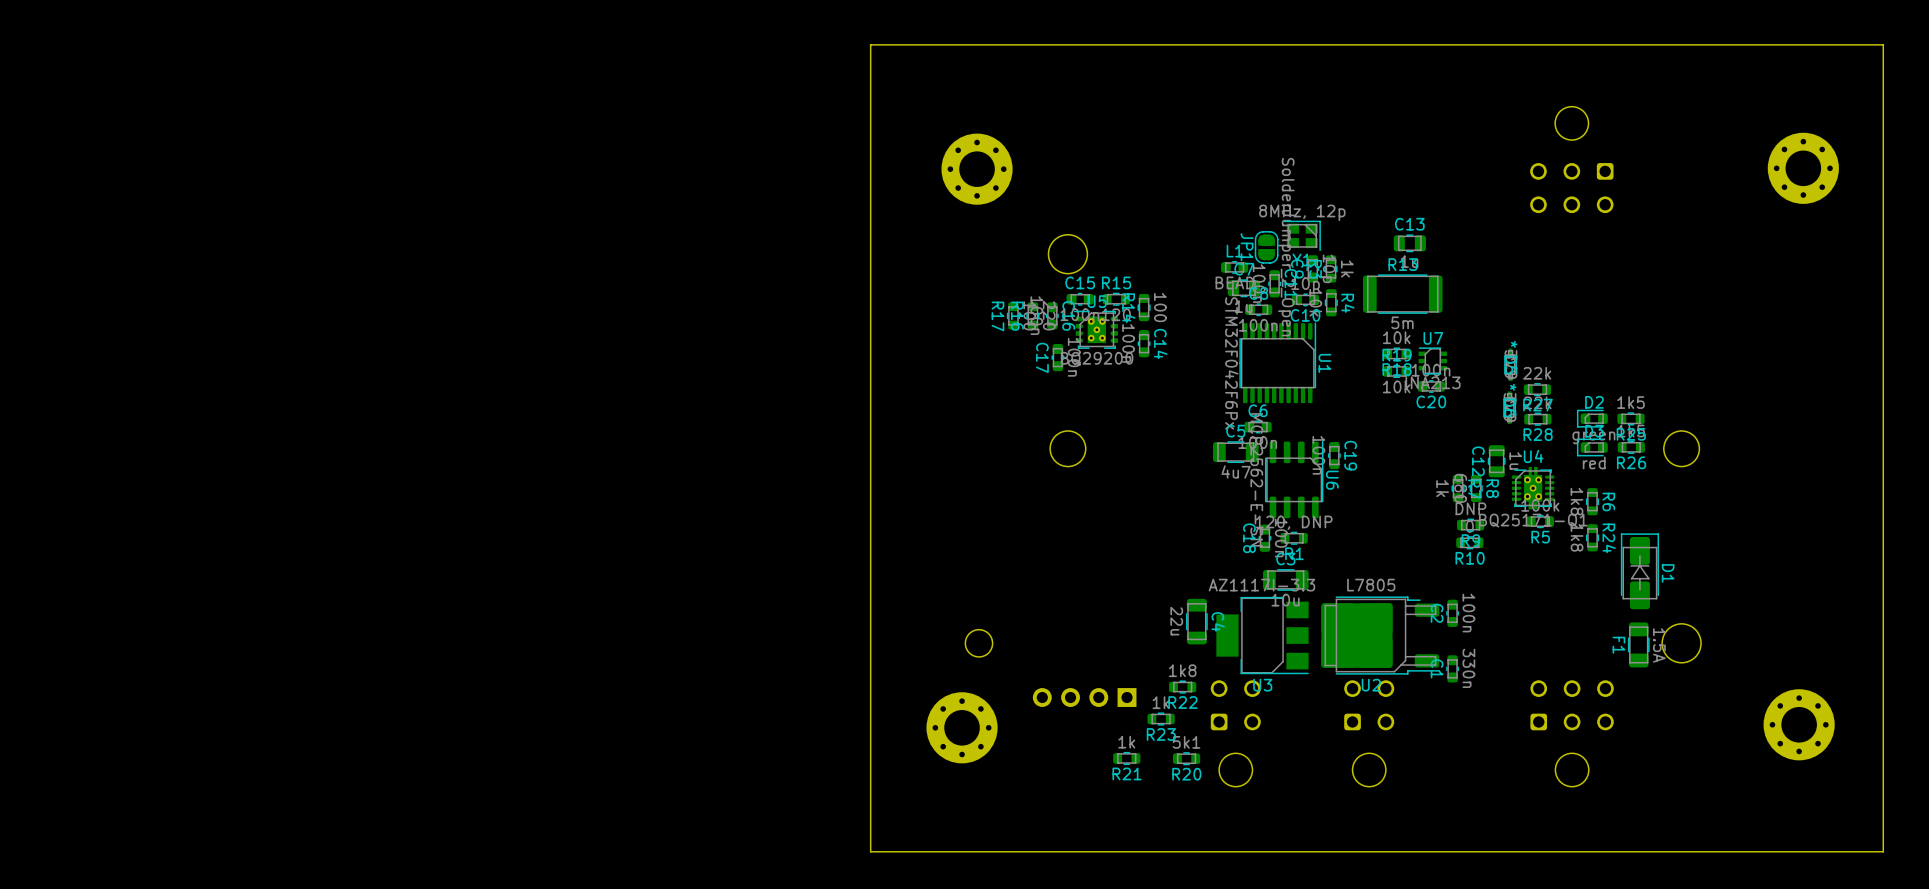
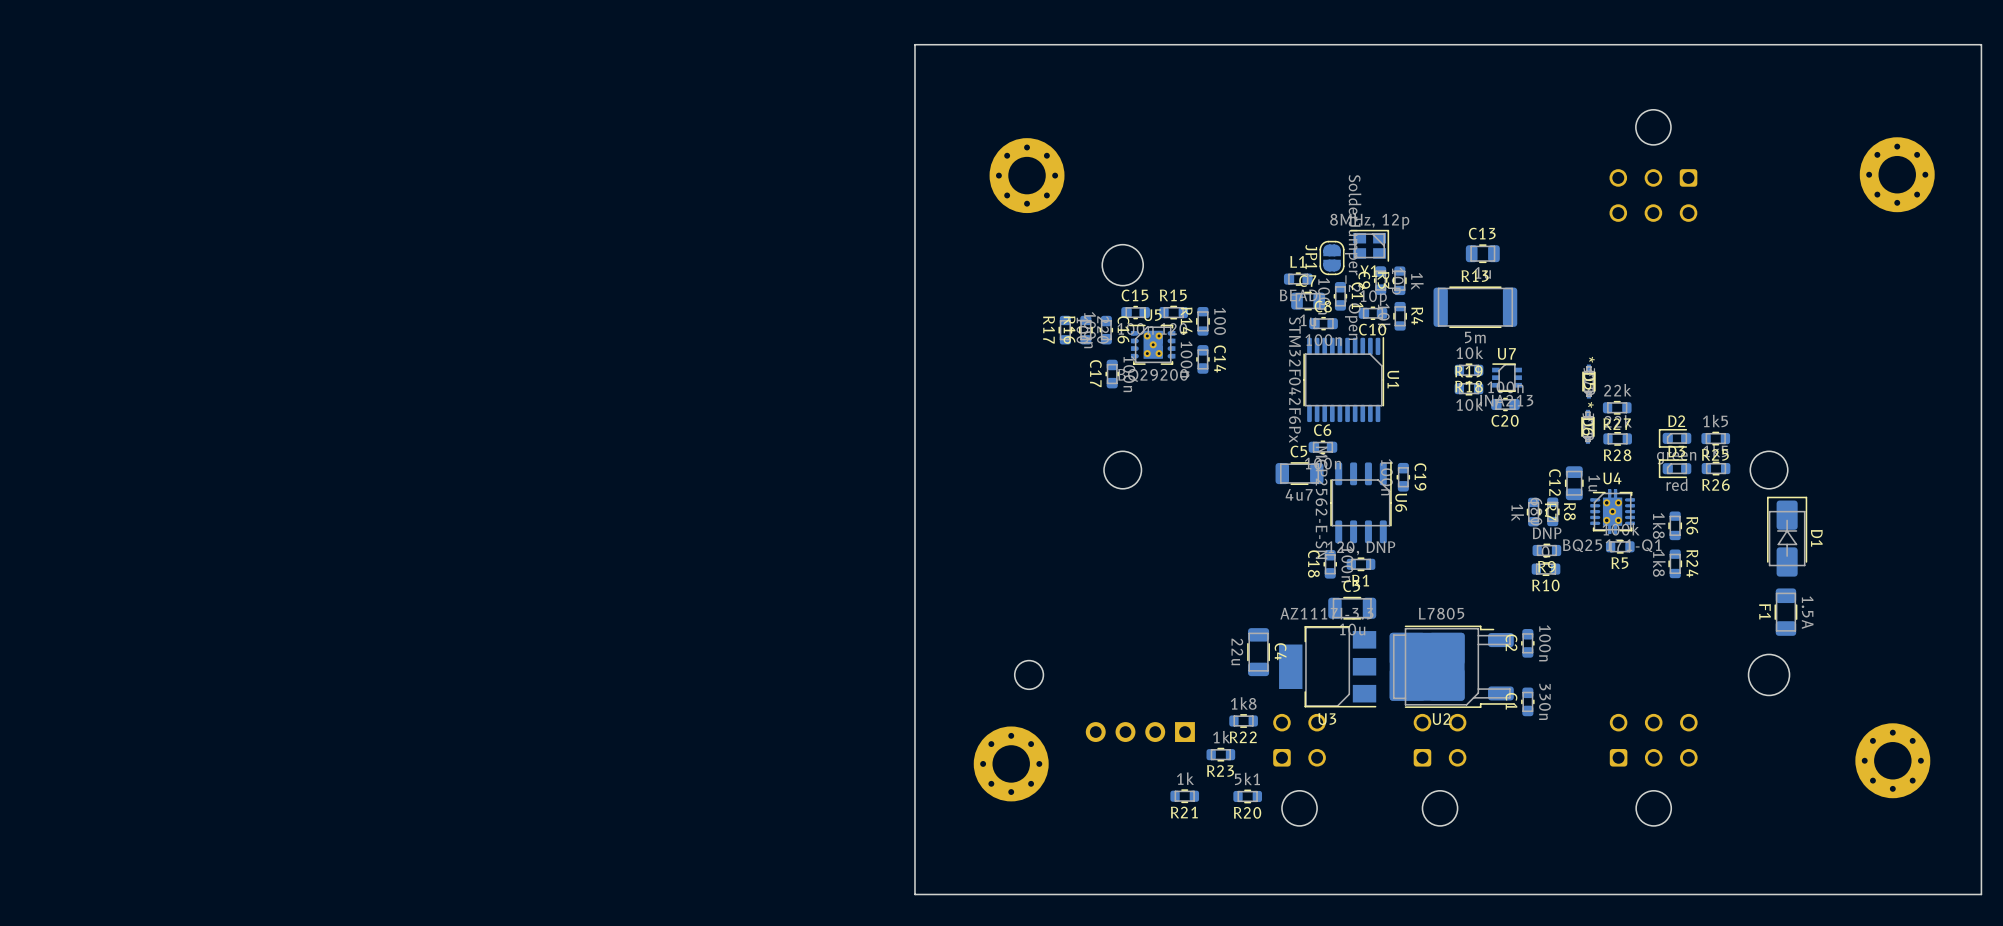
D1 position: (1639, 571) -> (1787, 536)
F1 position: (1638, 644) -> (1785, 612)

